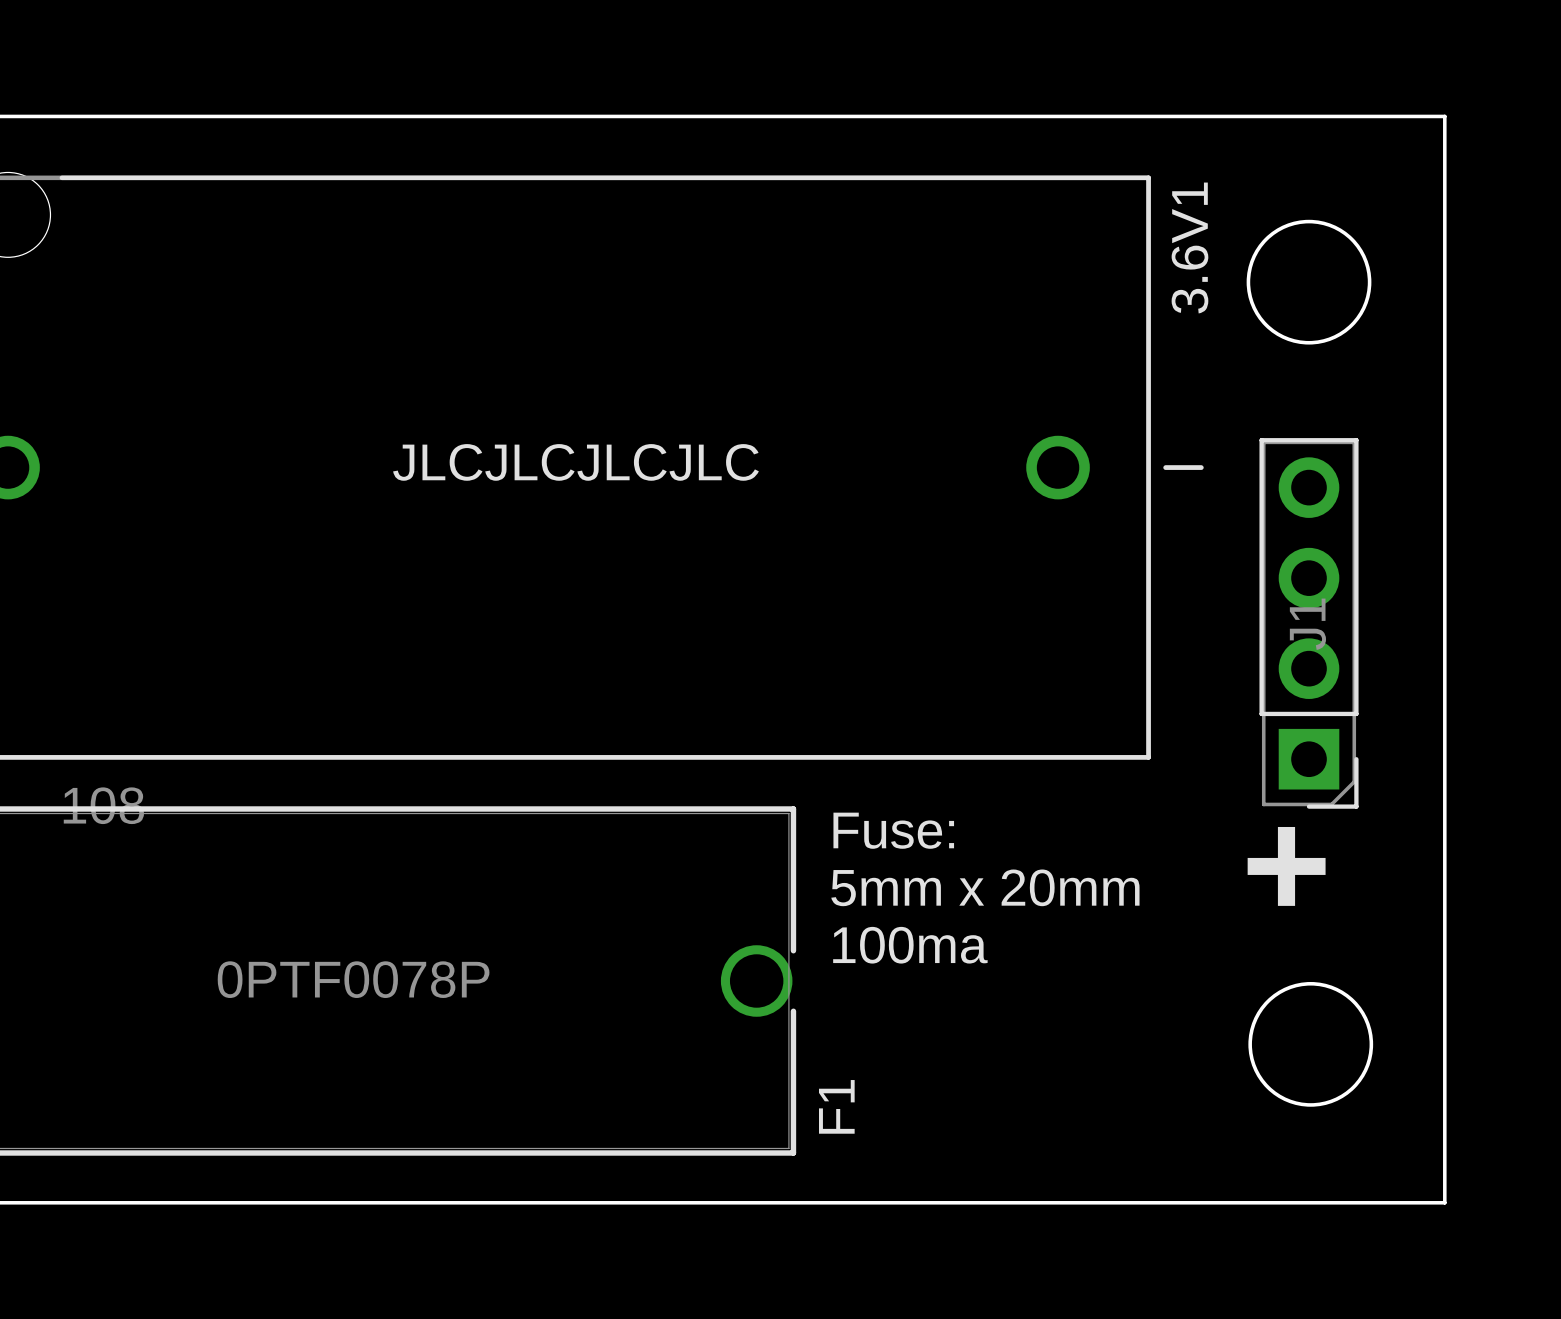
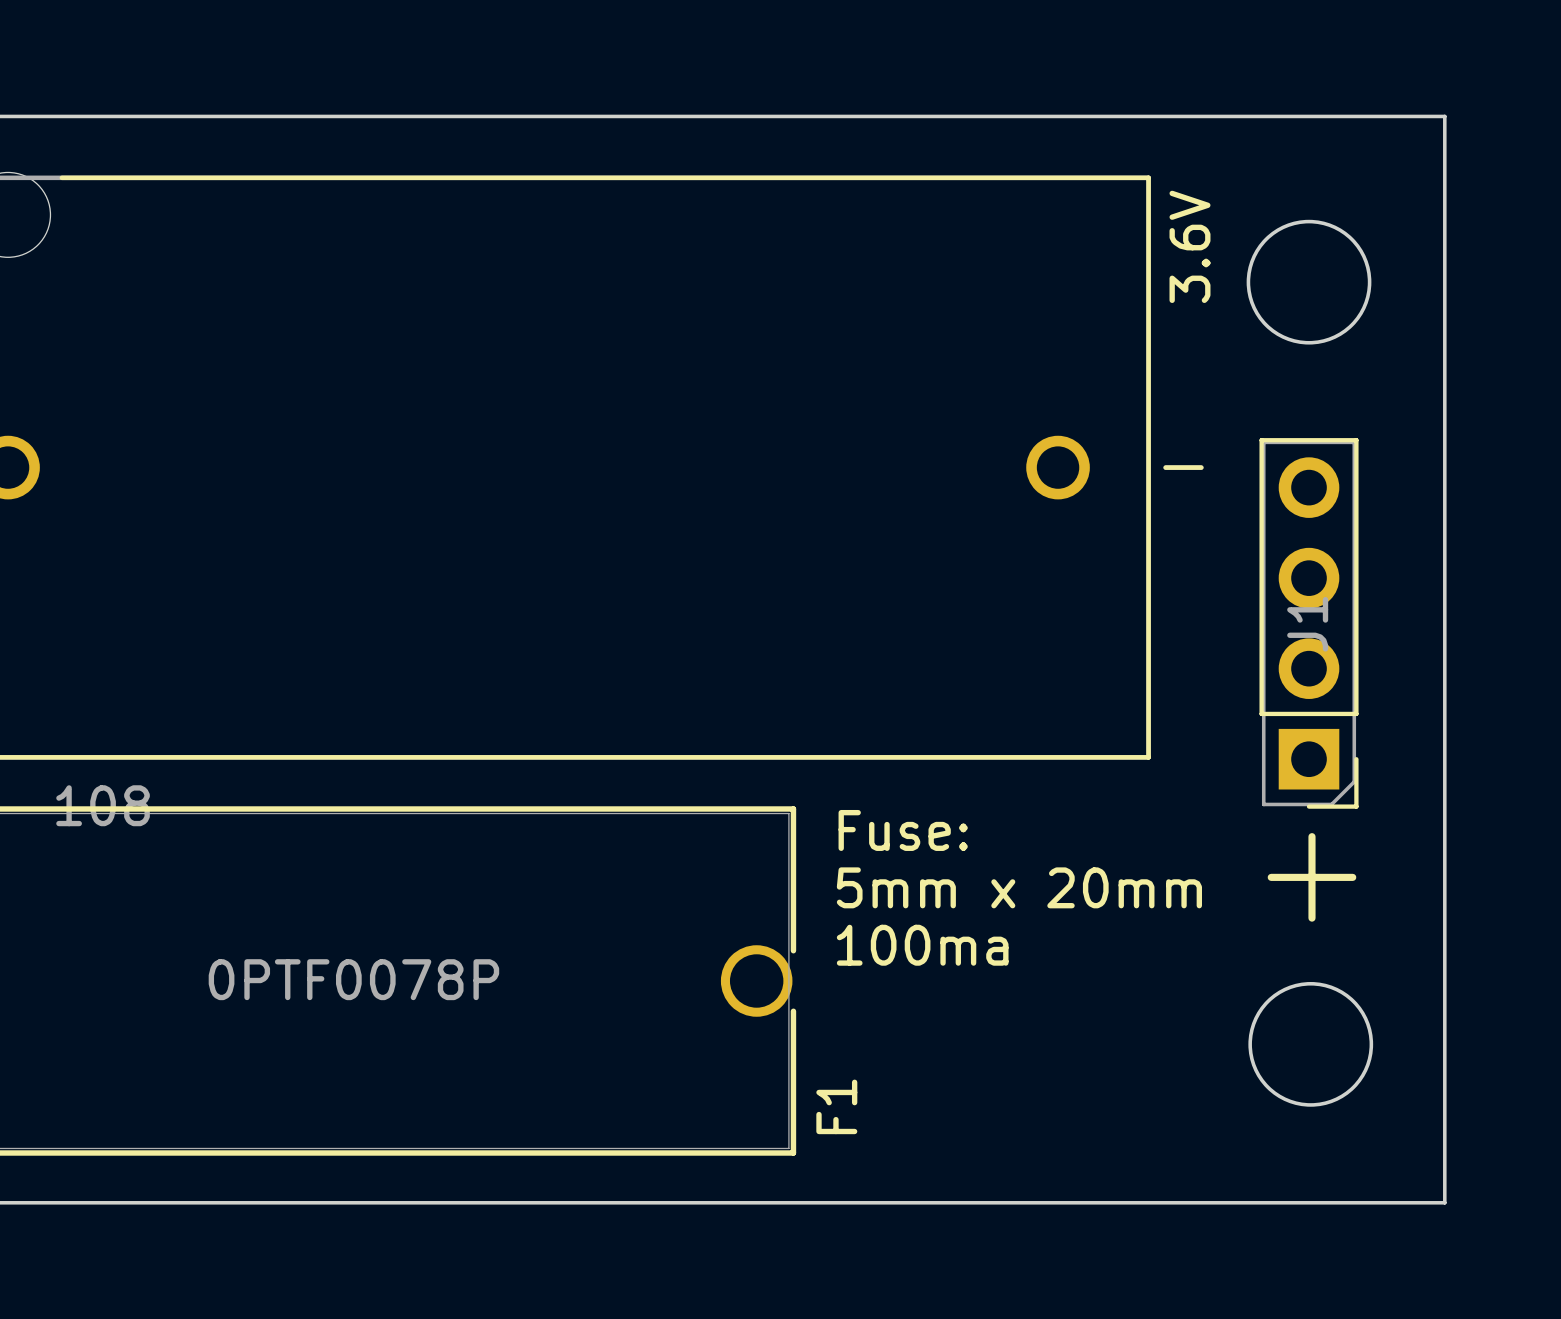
3.6V1 name: 3.6V1 (1189, 247) -> 3.6V (1189, 246)
text: JLCJLCJLCJLC (575, 462) -> none

